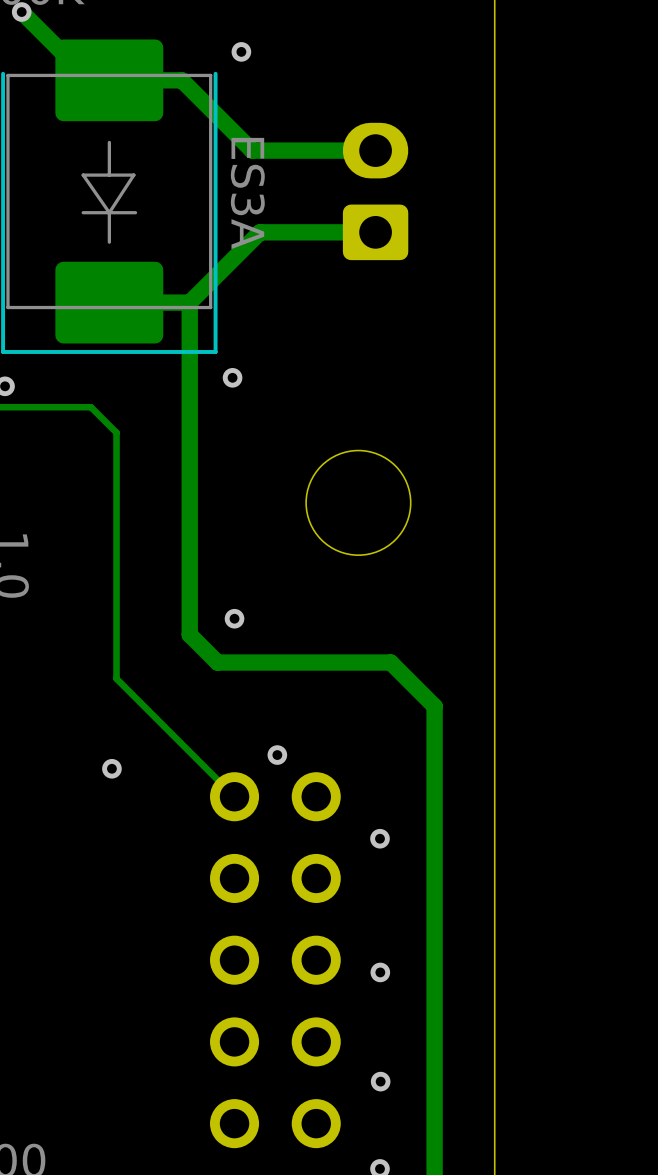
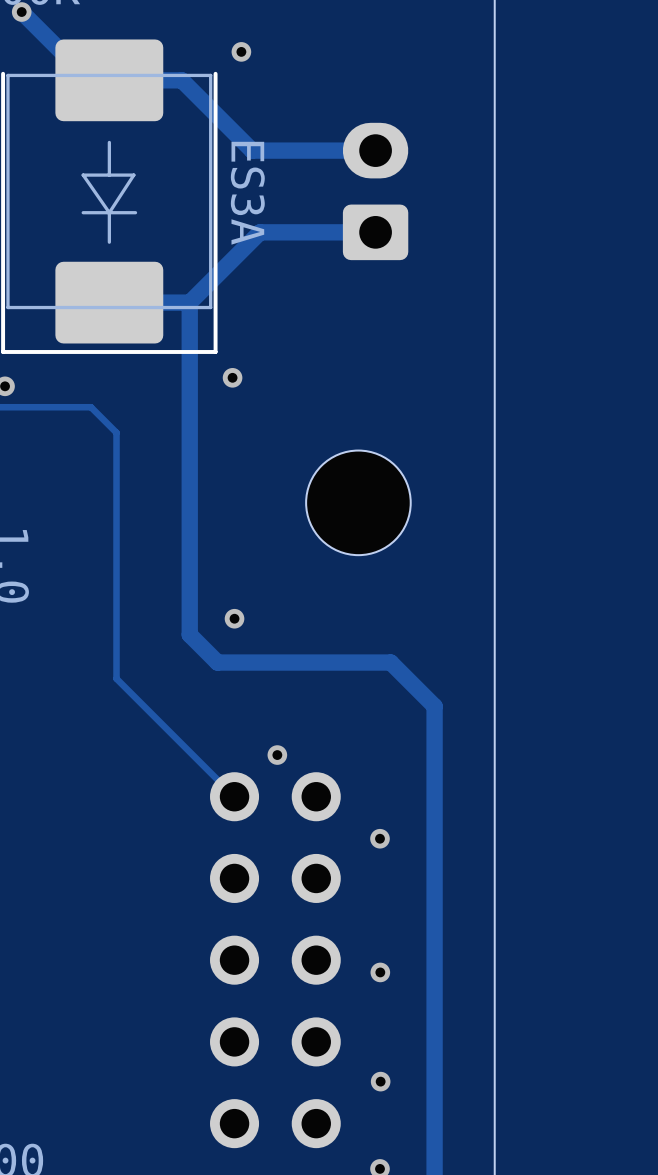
via: (111, 768) -> none

